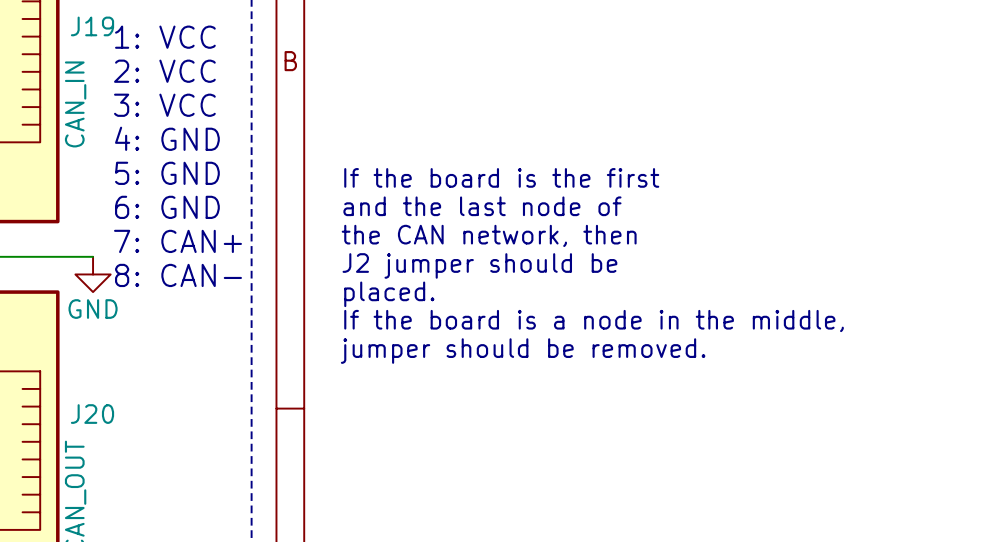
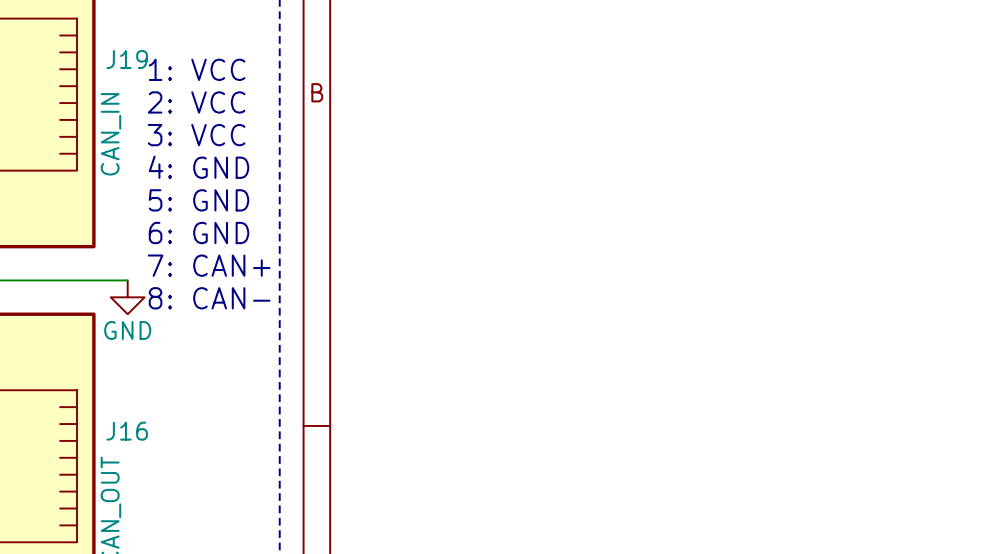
text: If the board is the first (501, 177) -> none
text: and the last node of (482, 206) -> none
text: the CAN network, then (489, 235) -> none
text: J2 jumper should be (479, 265) -> none
text: placed. (389, 294) -> none
text: If the board is a node in the middle, (594, 321) -> none
text: jumper should be removed. (523, 351) -> none
J20 name: J20 (92, 414) -> J16 (127, 431)

